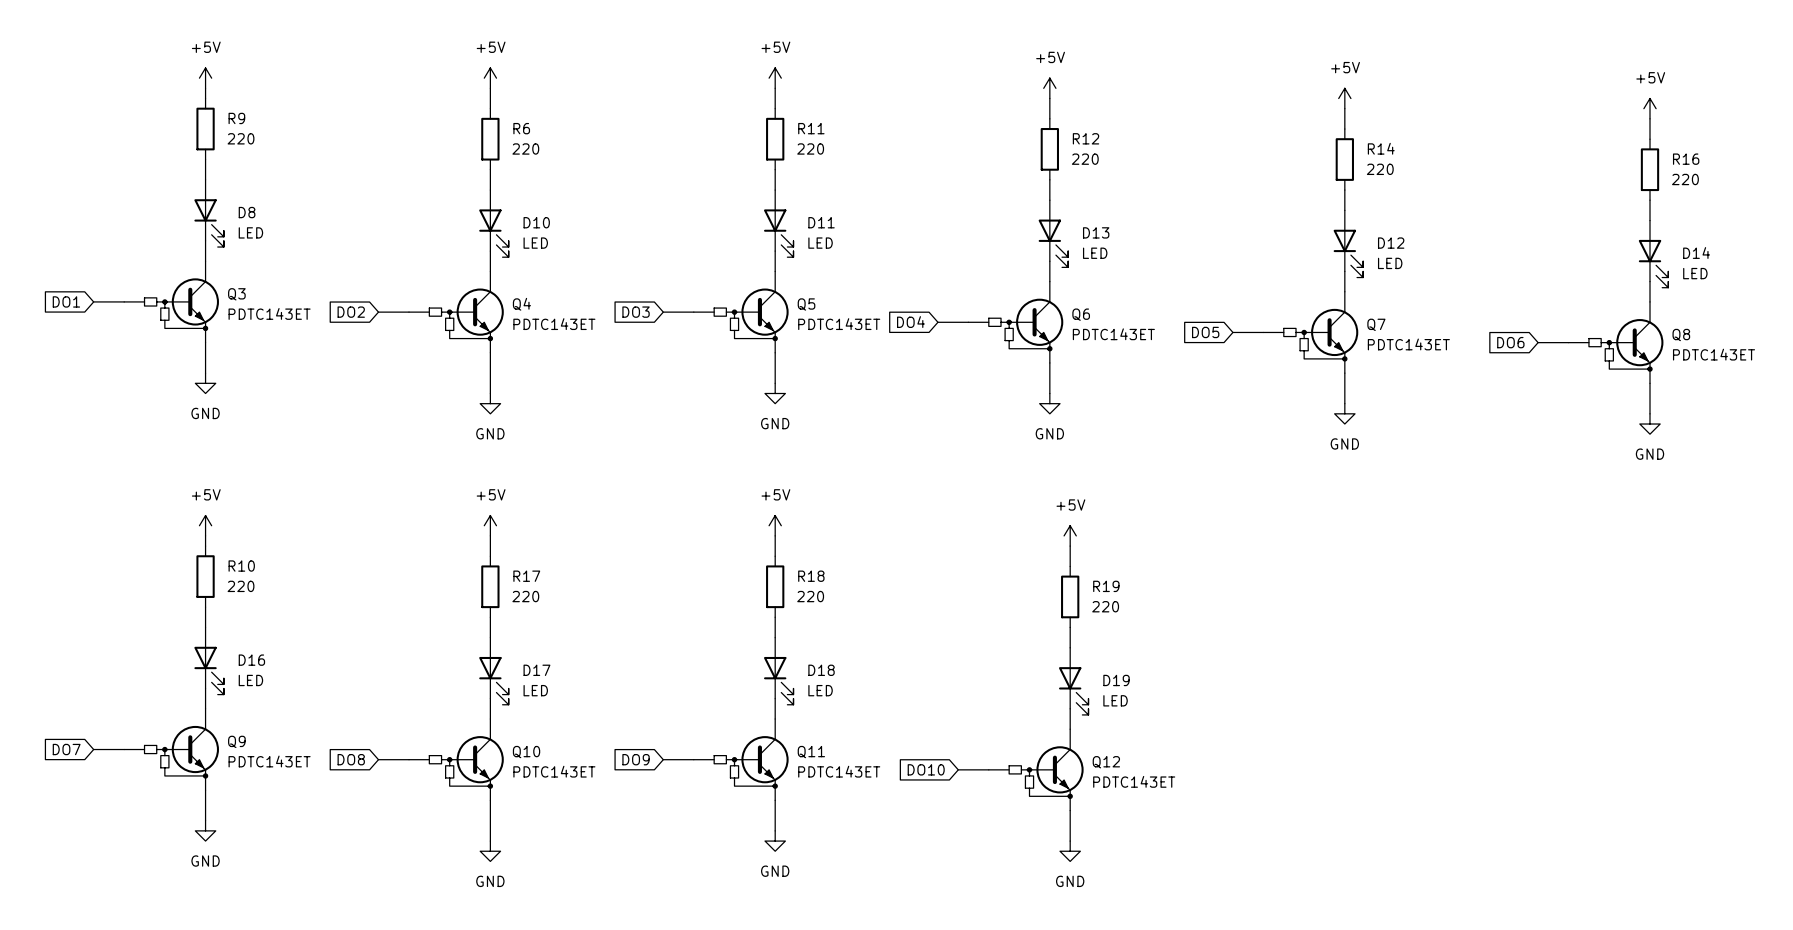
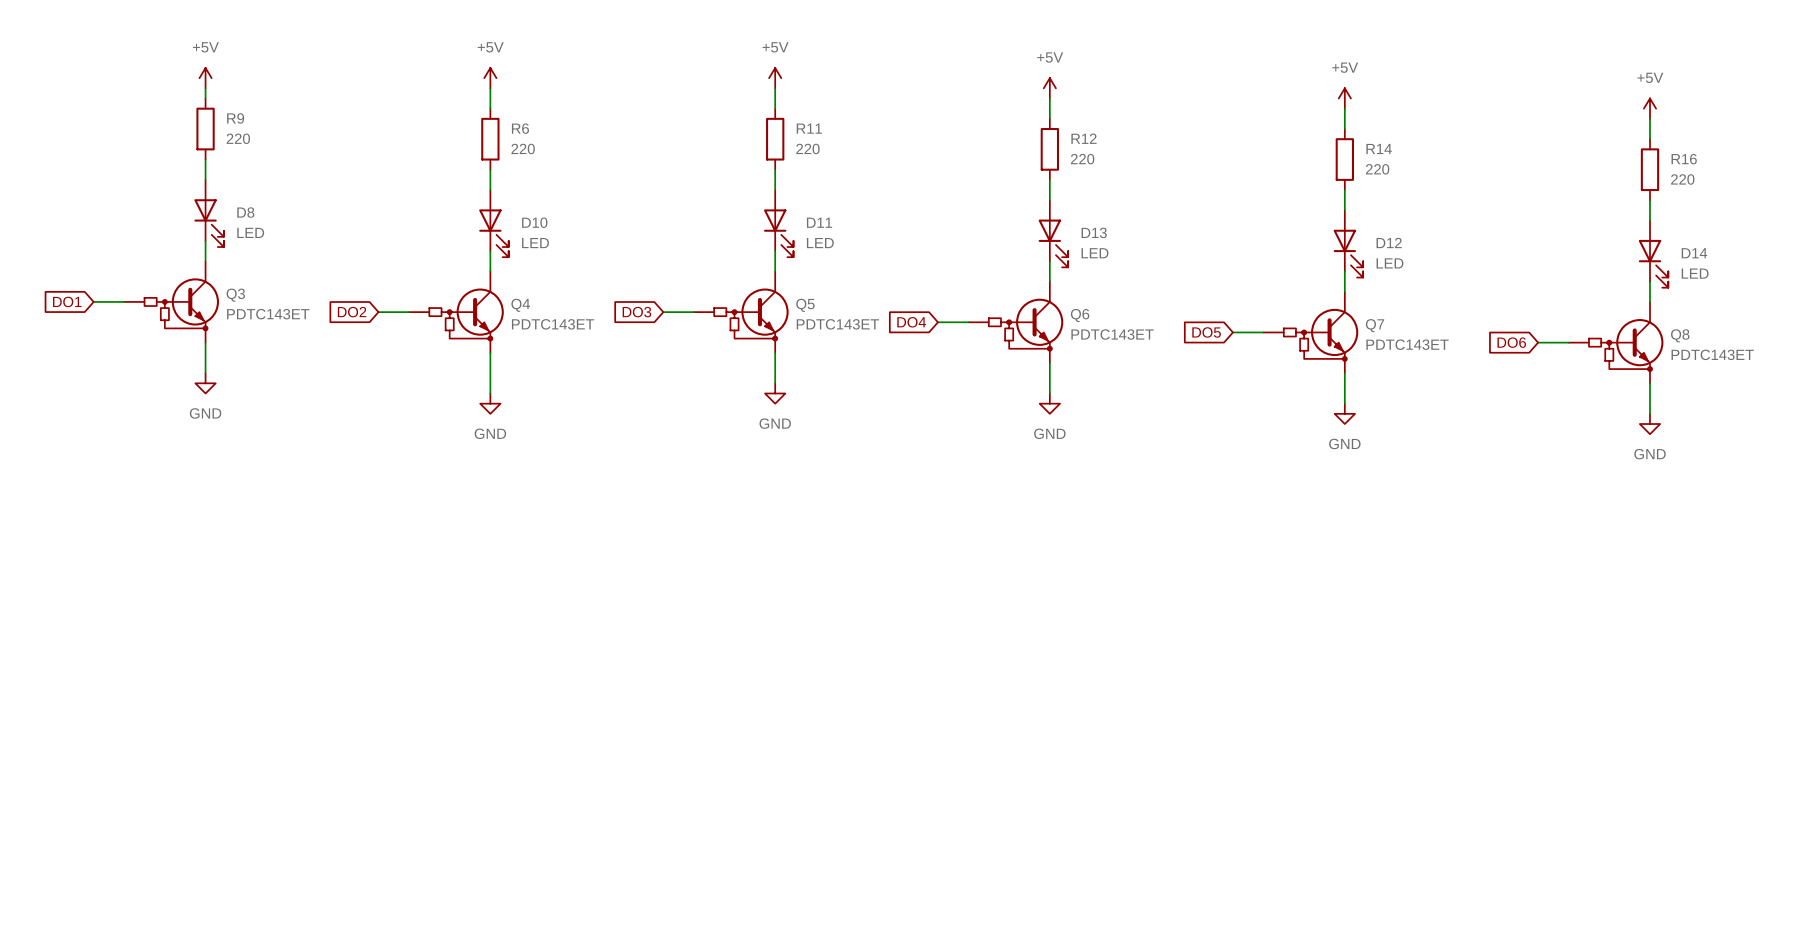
power symbol: +5V (205, 525) -> none
power symbol: +5V (490, 525) -> none
power symbol: +5V (775, 525) -> none
wire: (205, 535) (205, 546) -> none
wire: (490, 535) (490, 556) -> none
wire: (775, 535) (775, 556) -> none
power symbol: +5V (1070, 535) -> none
wire: (1070, 546) (1070, 566) -> none
R10: 220 (205, 576) -> none
R17: 220 (490, 586) -> none
R18: 220 (775, 586) -> none
R19: 220 (1070, 596) -> none
wire: (205, 607) (205, 627) -> none
wire: (490, 617) (490, 637) -> none
wire: (775, 617) (775, 637) -> none
wire: (1070, 627) (1070, 647) -> none
D16: LED (209, 661) -> none
D17: LED (493, 671) -> none
D18: LED (778, 671) -> none
D19: LED (1073, 681) -> none
wire: (205, 688) (205, 708) -> none
wire: (490, 698) (490, 719) -> none
wire: (775, 698) (775, 719) -> none
wire: (1070, 708) (1070, 729) -> none
global label: DO7 (66, 749) -> none
wire: (93, 749) (124, 749) -> none
Q9: PDTC143ET (171, 749) -> none
global label: DO8 (351, 759) -> none
wire: (378, 759) (409, 759) -> none
Q10: PDTC143ET (456, 759) -> none
global label: DO9 (636, 759) -> none
wire: (663, 759) (693, 759) -> none
Q11: PDTC143ET (741, 759) -> none
global label: DO10 (926, 769) -> none
wire: (958, 769) (988, 769) -> none
Q12: PDTC143ET (1036, 769) -> none
wire: (205, 790) (205, 820) -> none
wire: (490, 800) (490, 841) -> none
wire: (775, 800) (775, 830) -> none
wire: (1070, 810) (1070, 841) -> none
power symbol: GND (205, 830) -> none
power symbol: GND (775, 841) -> none
power symbol: GND (490, 851) -> none
power symbol: GND (1070, 851) -> none

